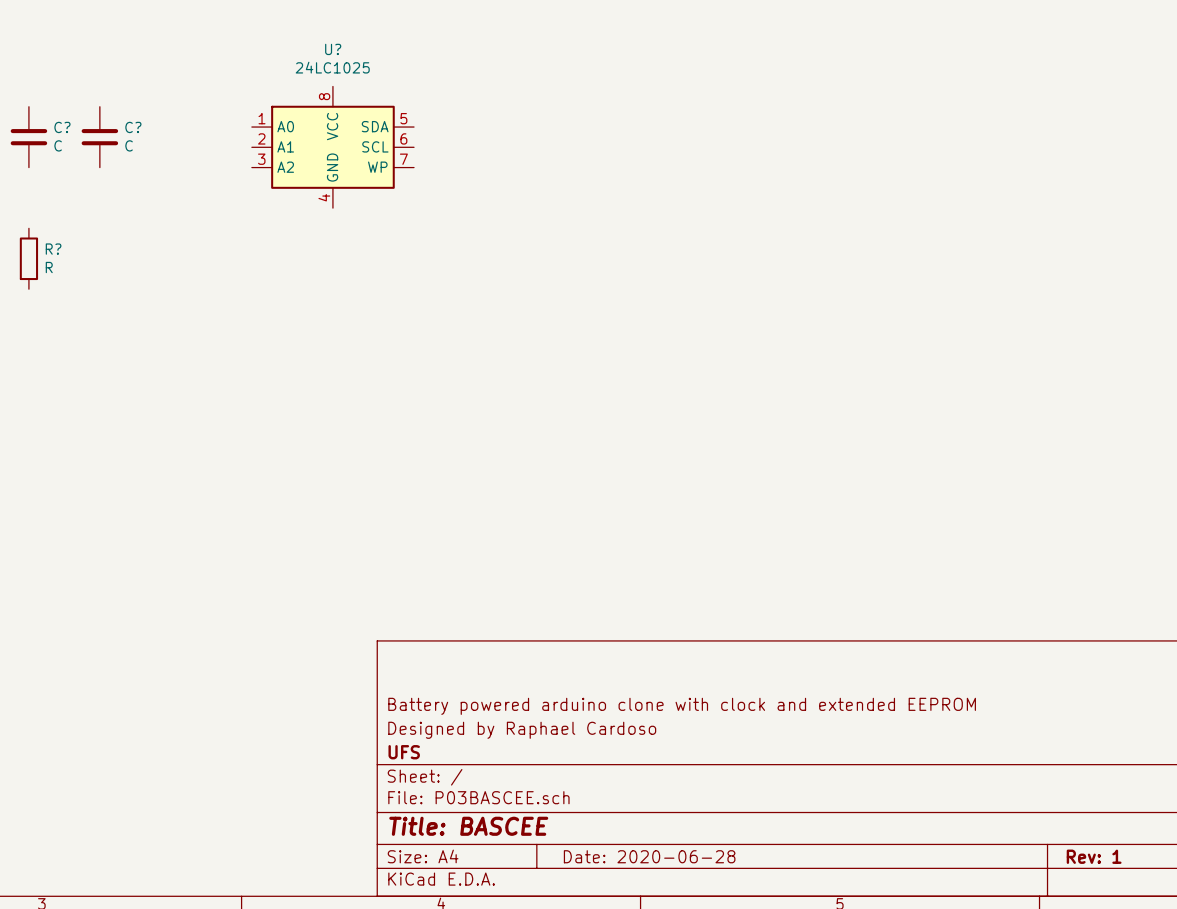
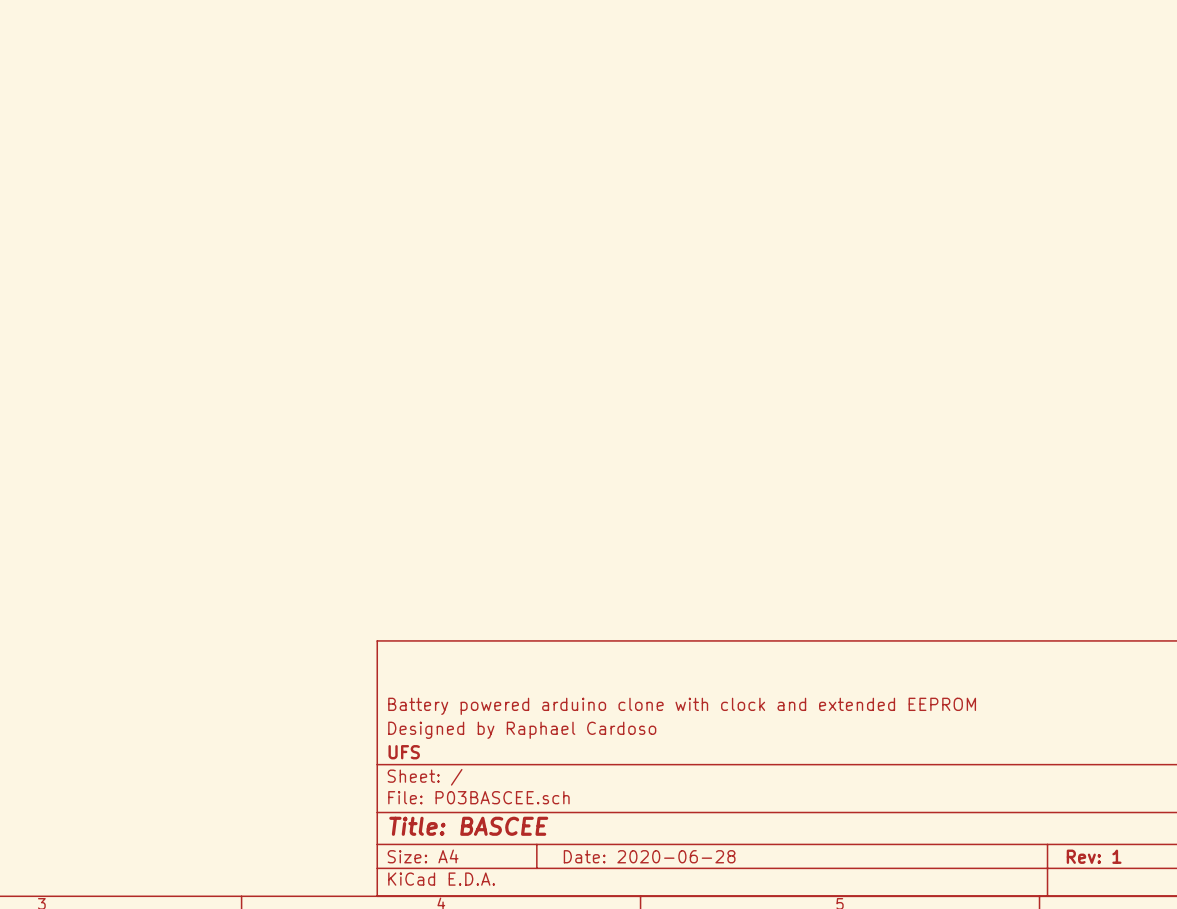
C?: C (28, 137) -> none
C?: C (99, 137) -> none
U?: 24LC1025 (332, 147) -> none
R?: R (28, 258) -> none

